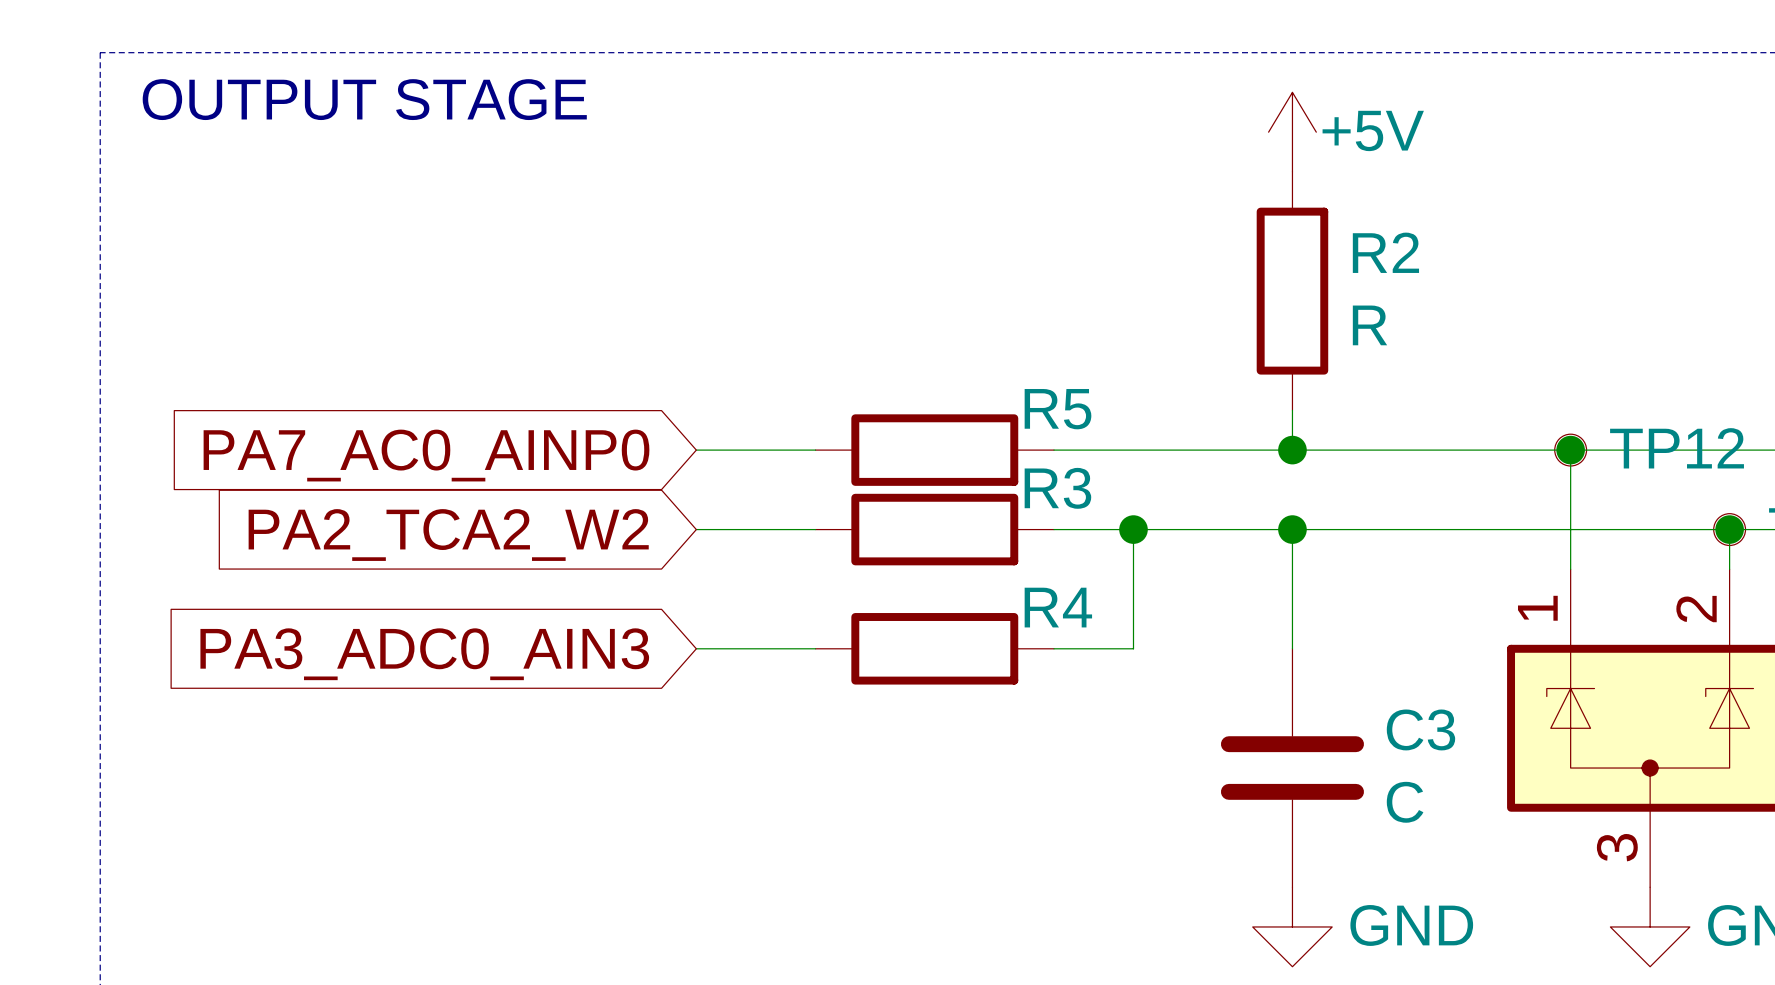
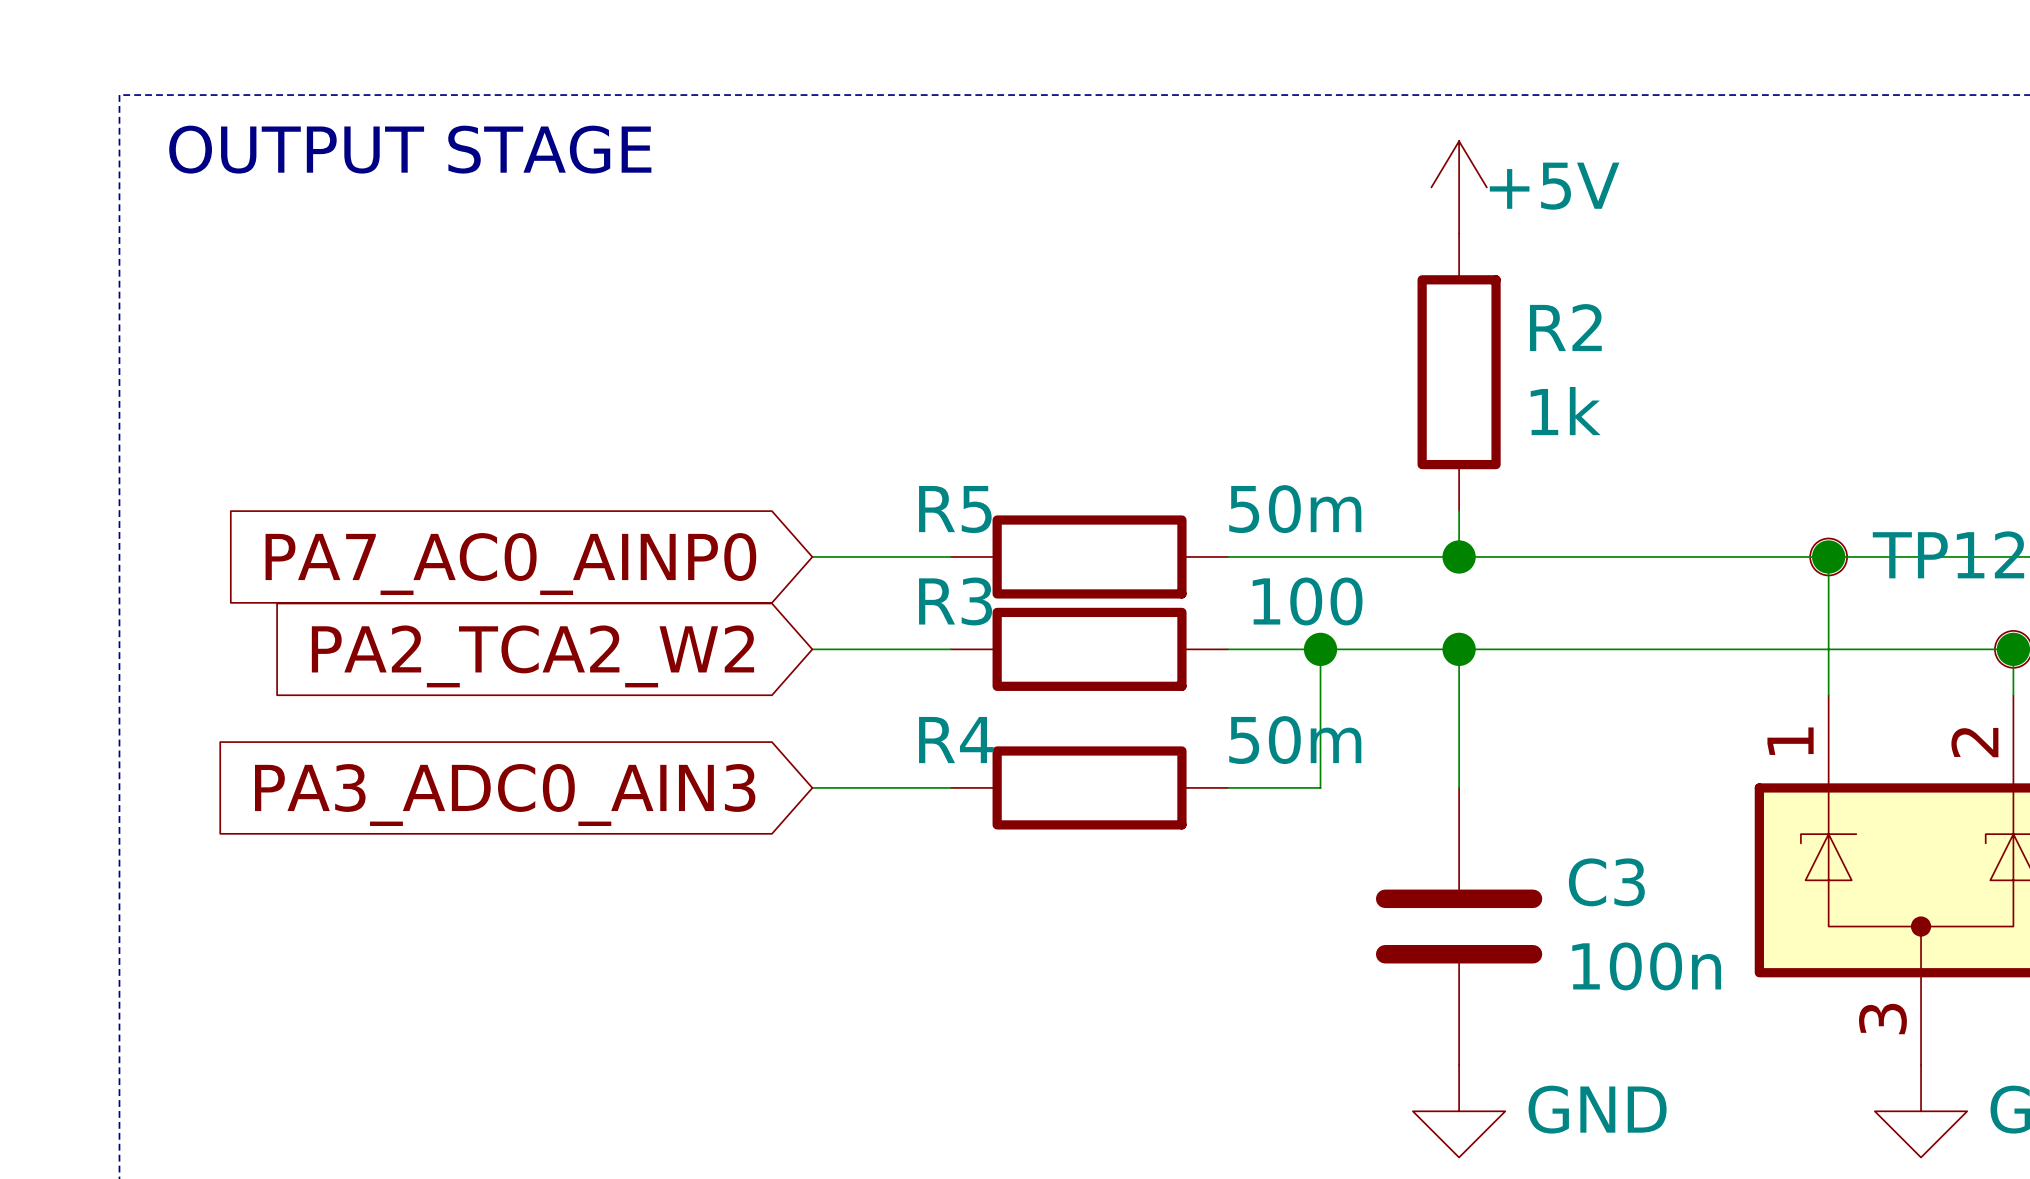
power symbol position: +5V (1292, 132) -> +5V (1459, 187)
R2 position: (1292, 291) -> (1459, 372)
R2 value: R (1369, 325) -> 1k (1565, 411)
R5 value: none -> 50m (1295, 509)
R5 name position: R5 (1057, 409) -> R5 (955, 509)
wire: (1292, 410) (1292, 450) -> (1459, 510) (1459, 556)
junction position: (1292, 450) -> (1459, 556)
R3 name position: R3 (1057, 488) -> R3 (955, 601)
R3 value: none -> 100 (1307, 601)
wire: (1292, 529) (1292, 648) -> (1459, 649) (1459, 787)
junction position: (1292, 529) -> (1459, 649)
R4 name position: R4 (1058, 607) -> R4 (956, 740)
R4 value: none -> 50m (1295, 740)
C3 position: (1292, 768) -> (1459, 926)
C3 value: C (1405, 802) -> 100n (1646, 966)
power symbol position: GND (1292, 926) -> GND (1459, 1111)

